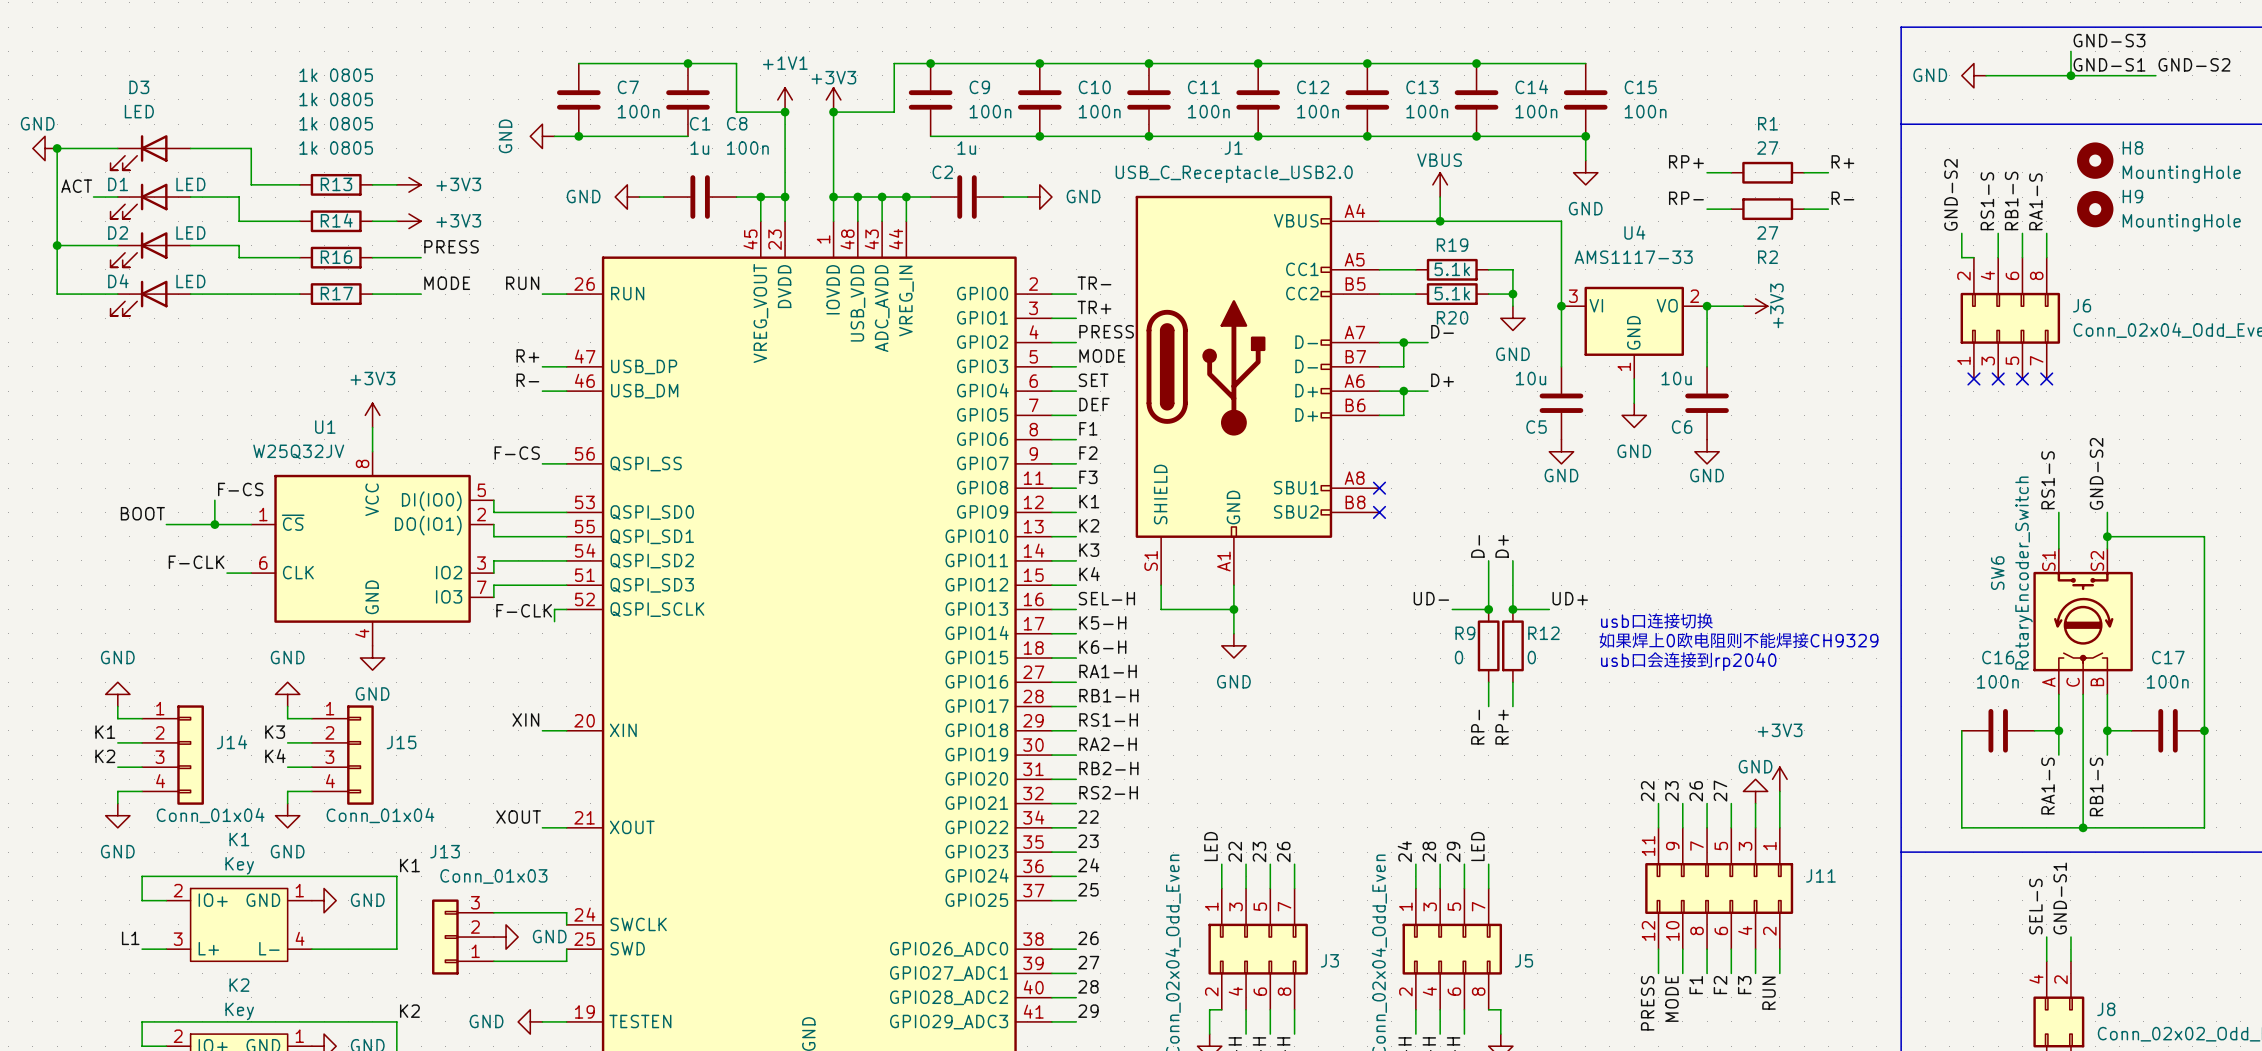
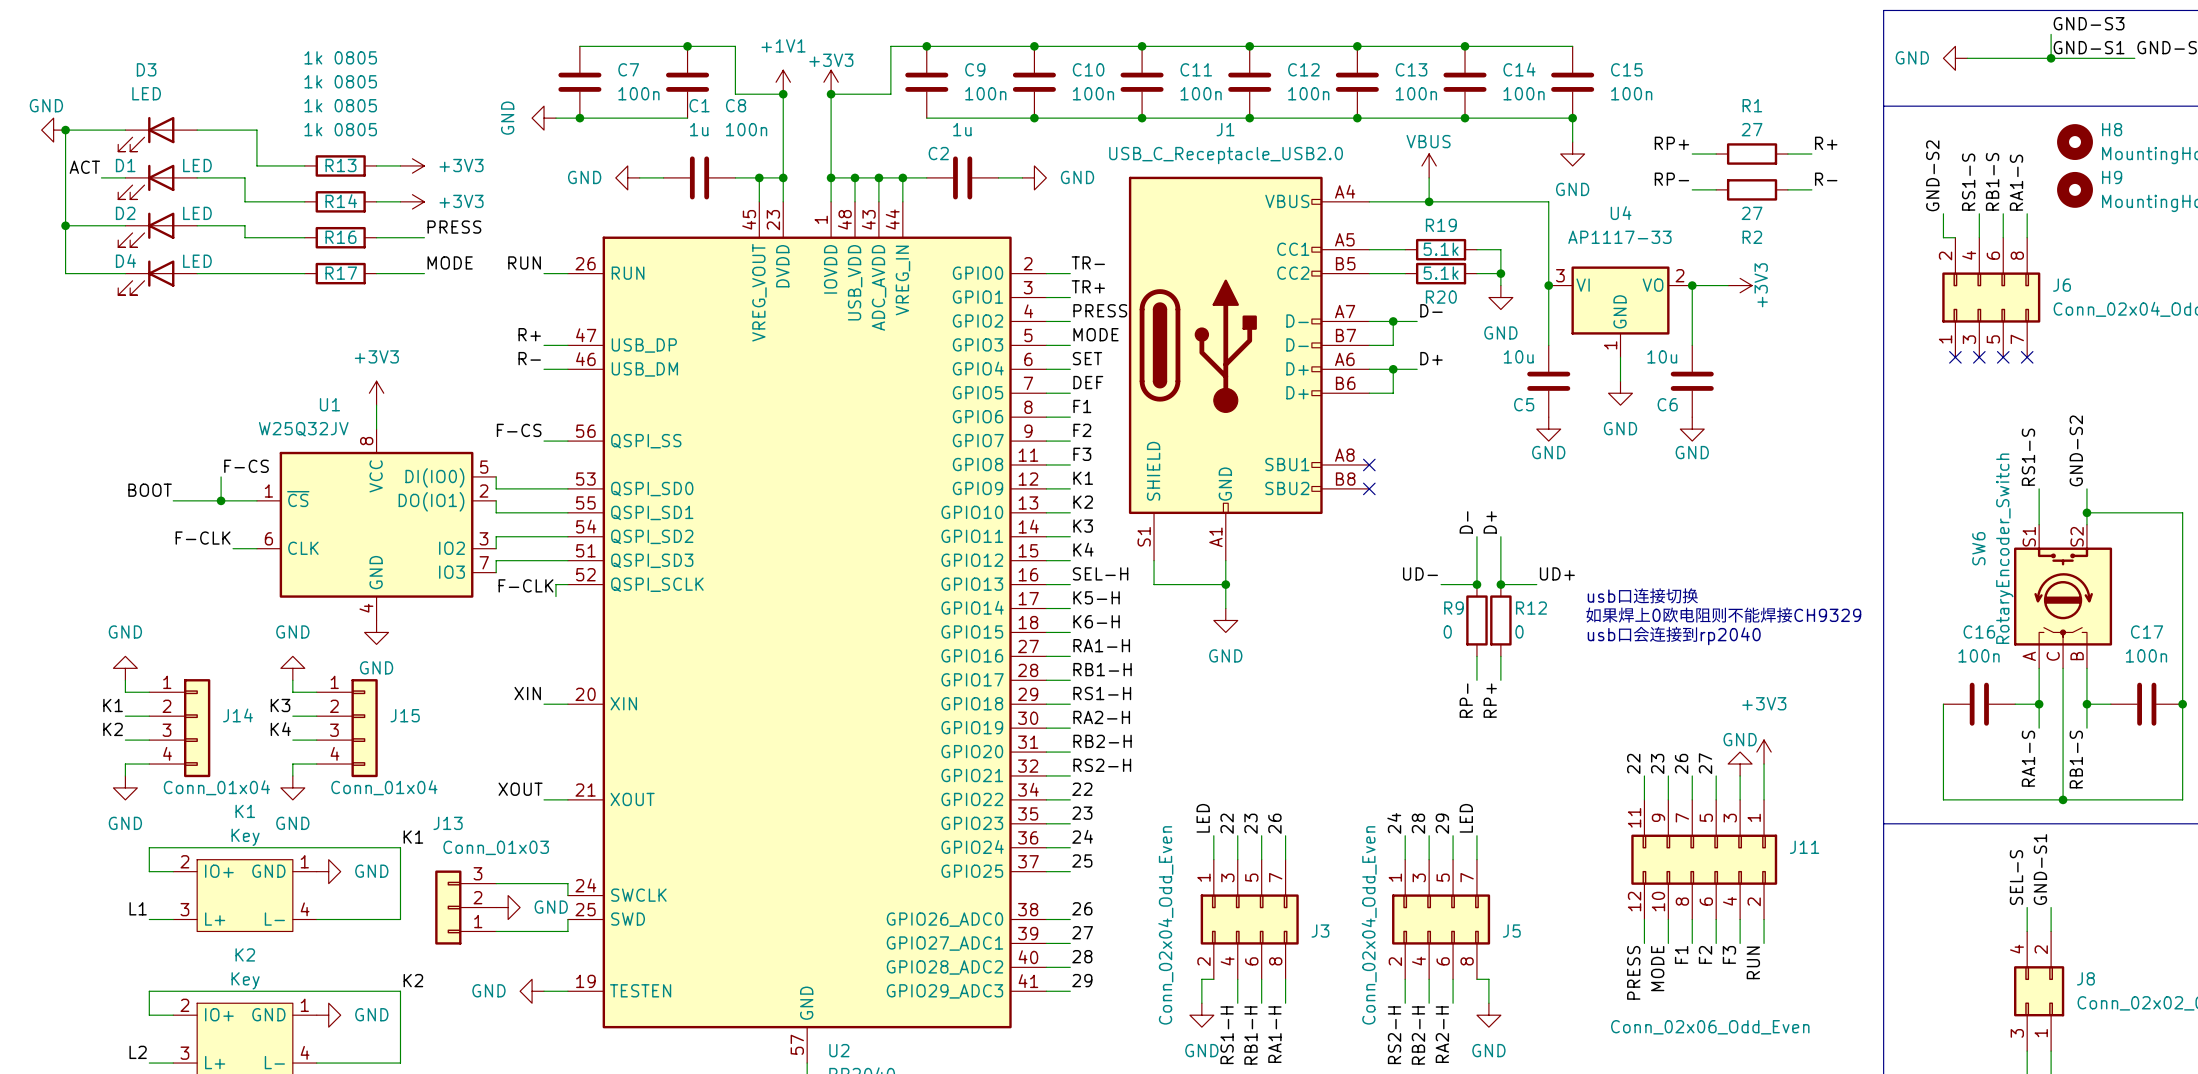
U4 value: AMS1117-33 (1633, 257) -> AP1117-33 (1619, 237)

